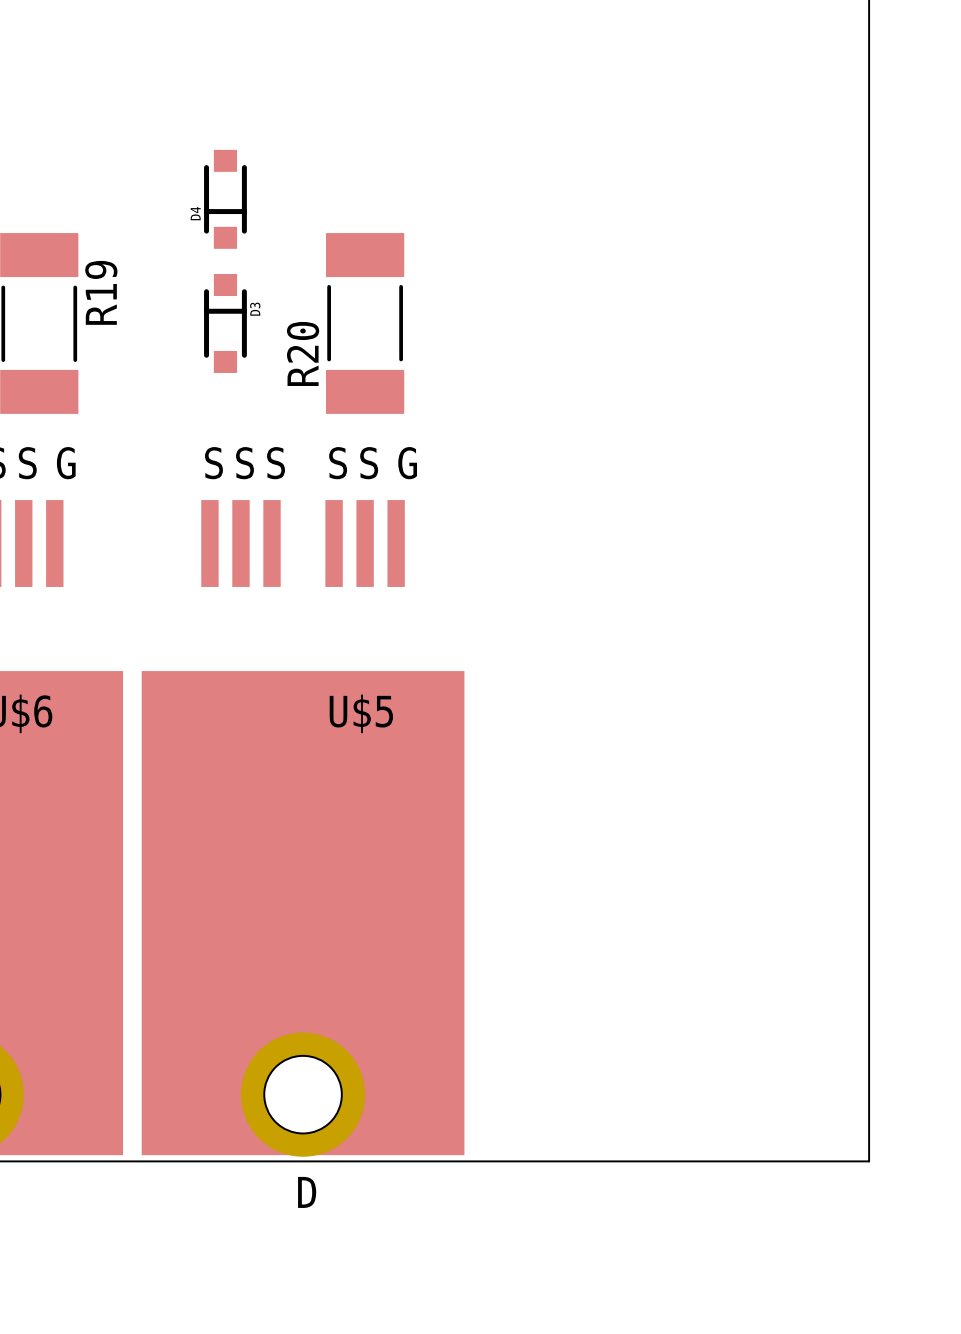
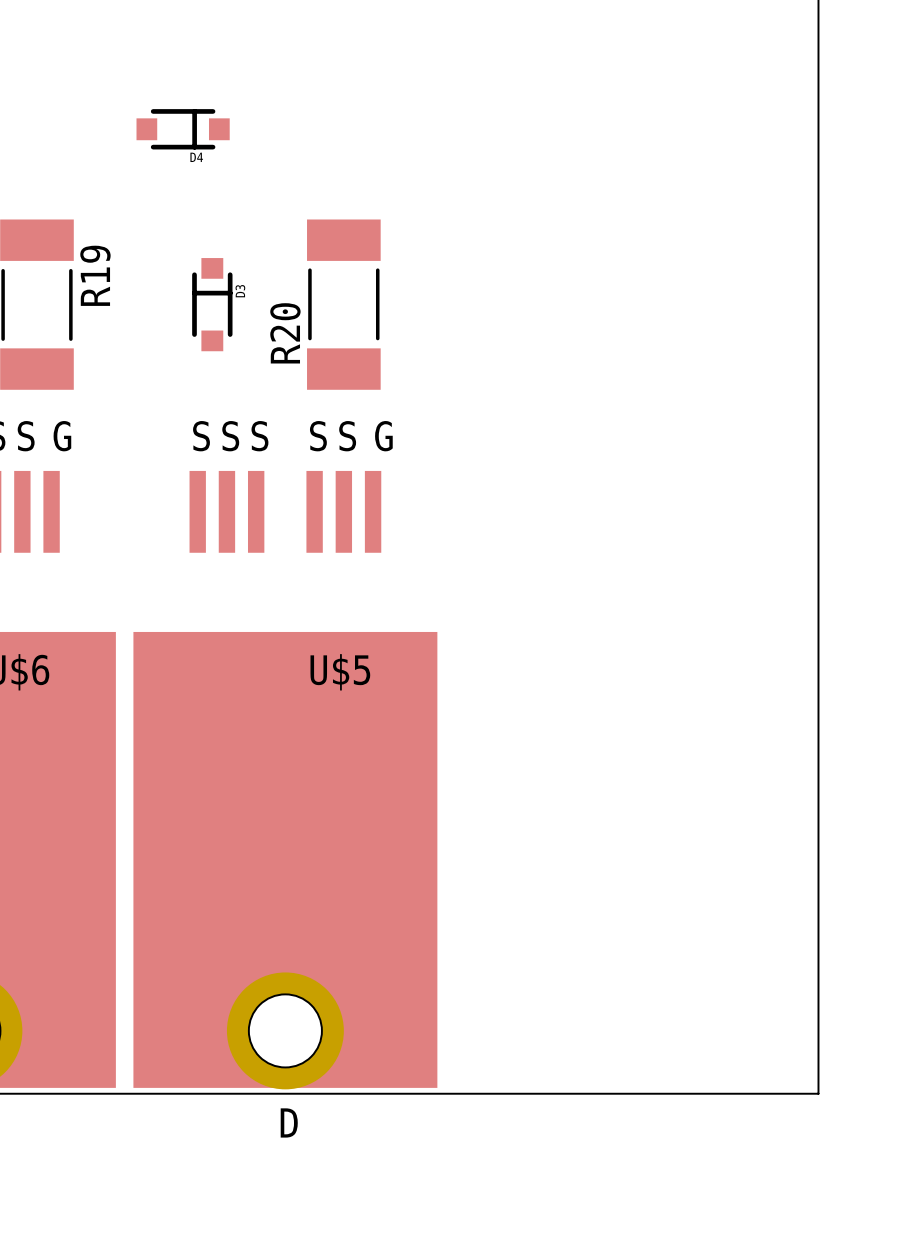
D4 rotation: 0° (225, 199) -> 90° counterclockwise (183, 129)
D4 position: (225, 199) -> (183, 129)

